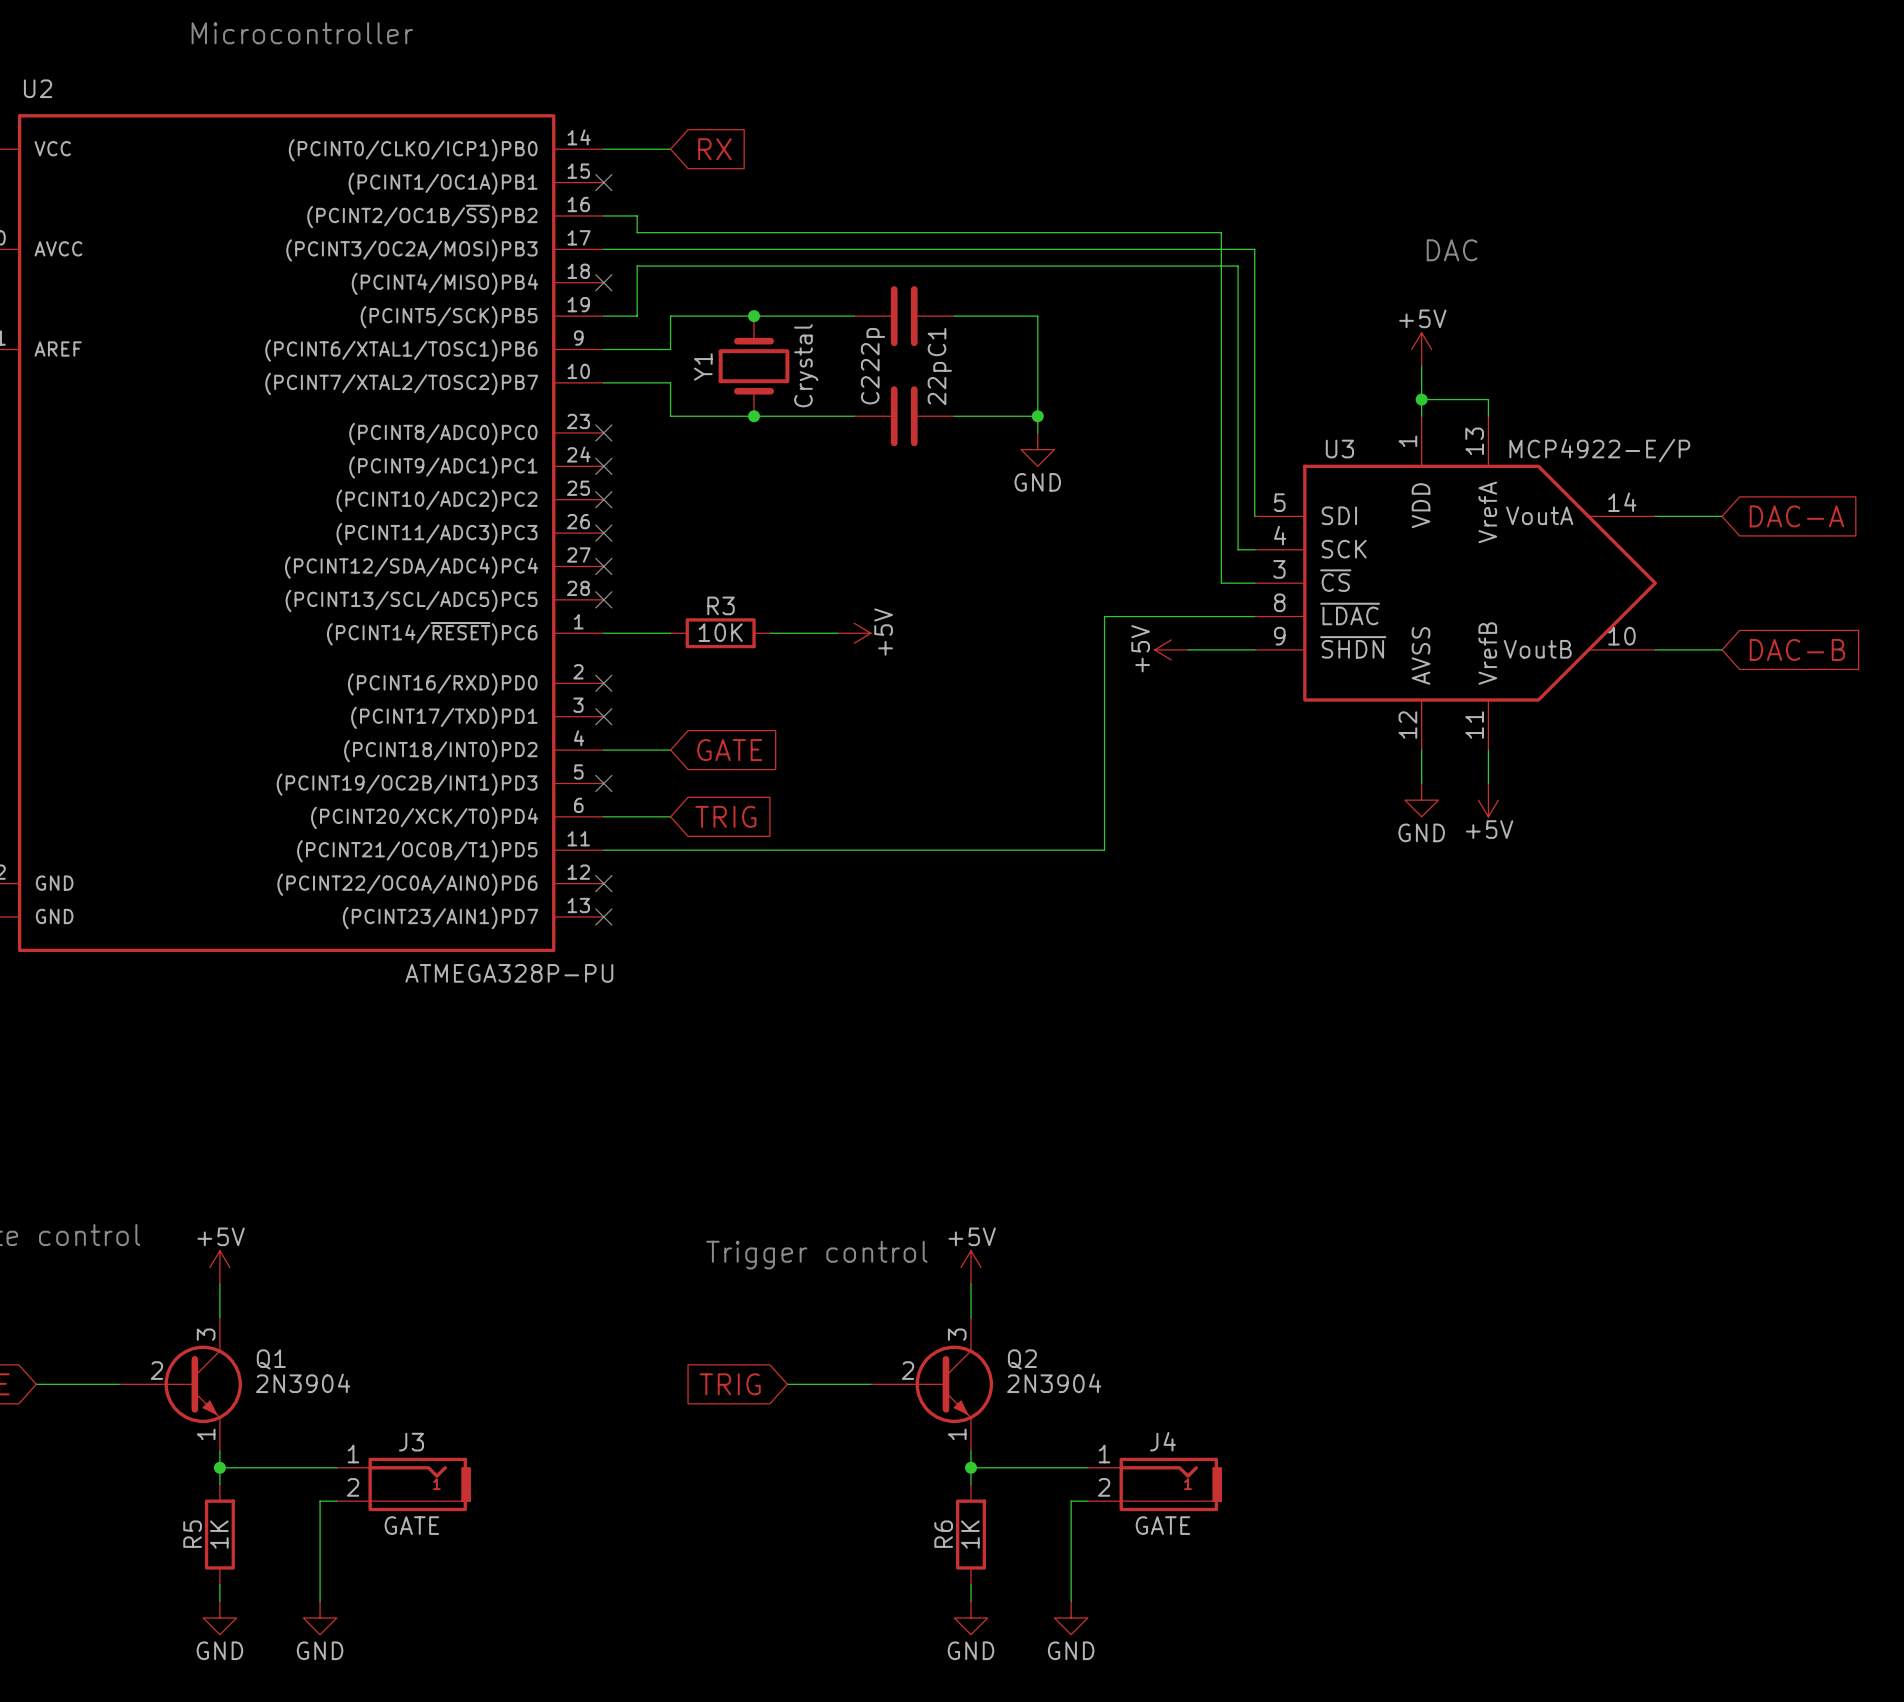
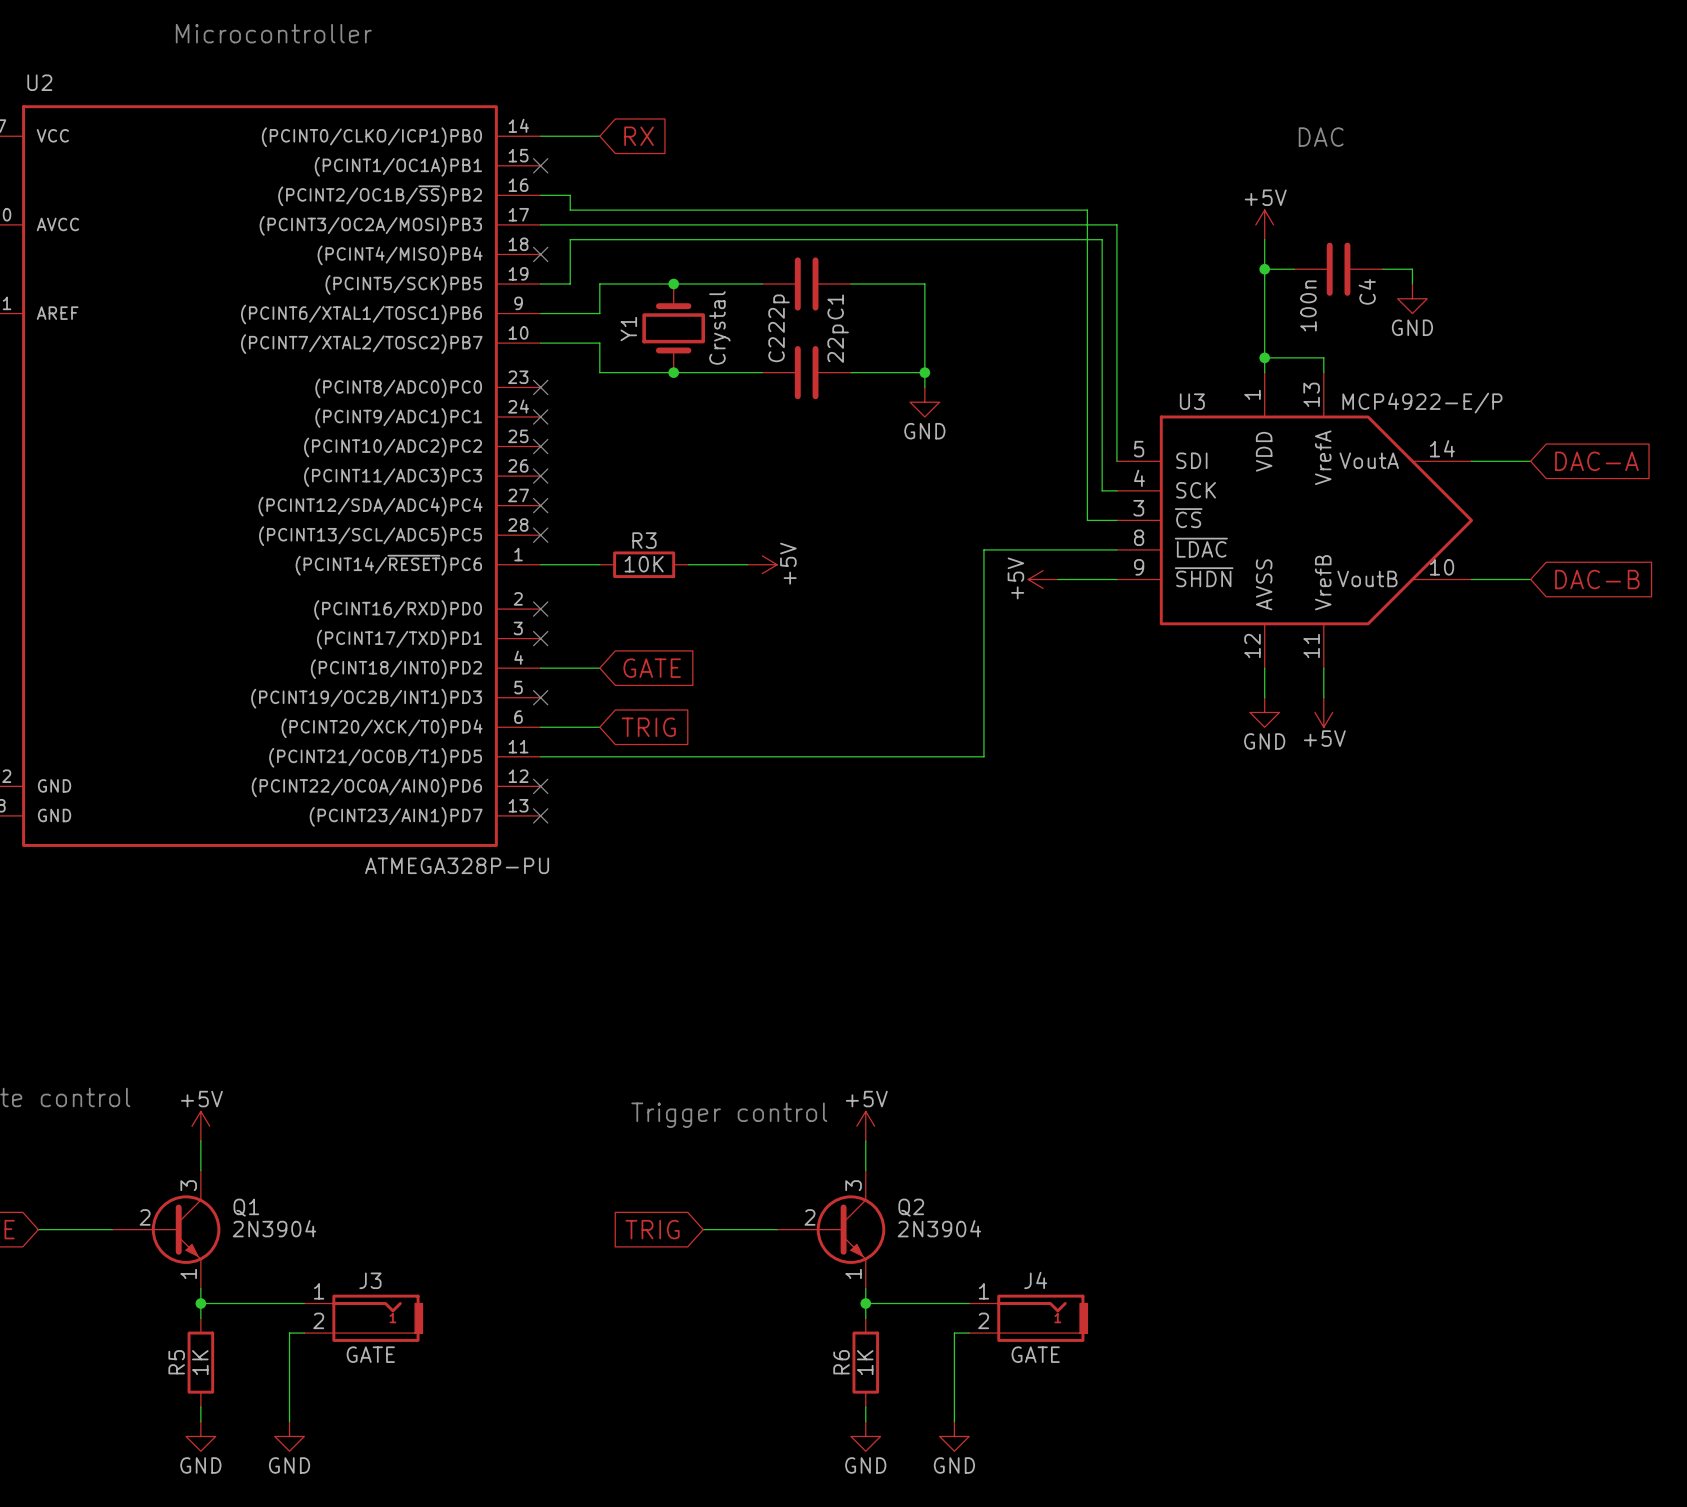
text position: DAC (1452, 250) -> DAC (1321, 137)
wire: none -> (1264, 239) (1264, 328)
wire: none -> (1264, 269) (1294, 269)
junction: none -> (1264, 269)
C4: none -> 100n (1338, 269)
wire: none -> (1382, 269) (1412, 269) (1412, 284)
power symbol: none -> GND (1412, 298)
power symbol position: +5V (1421, 349) -> +5V (1264, 224)

